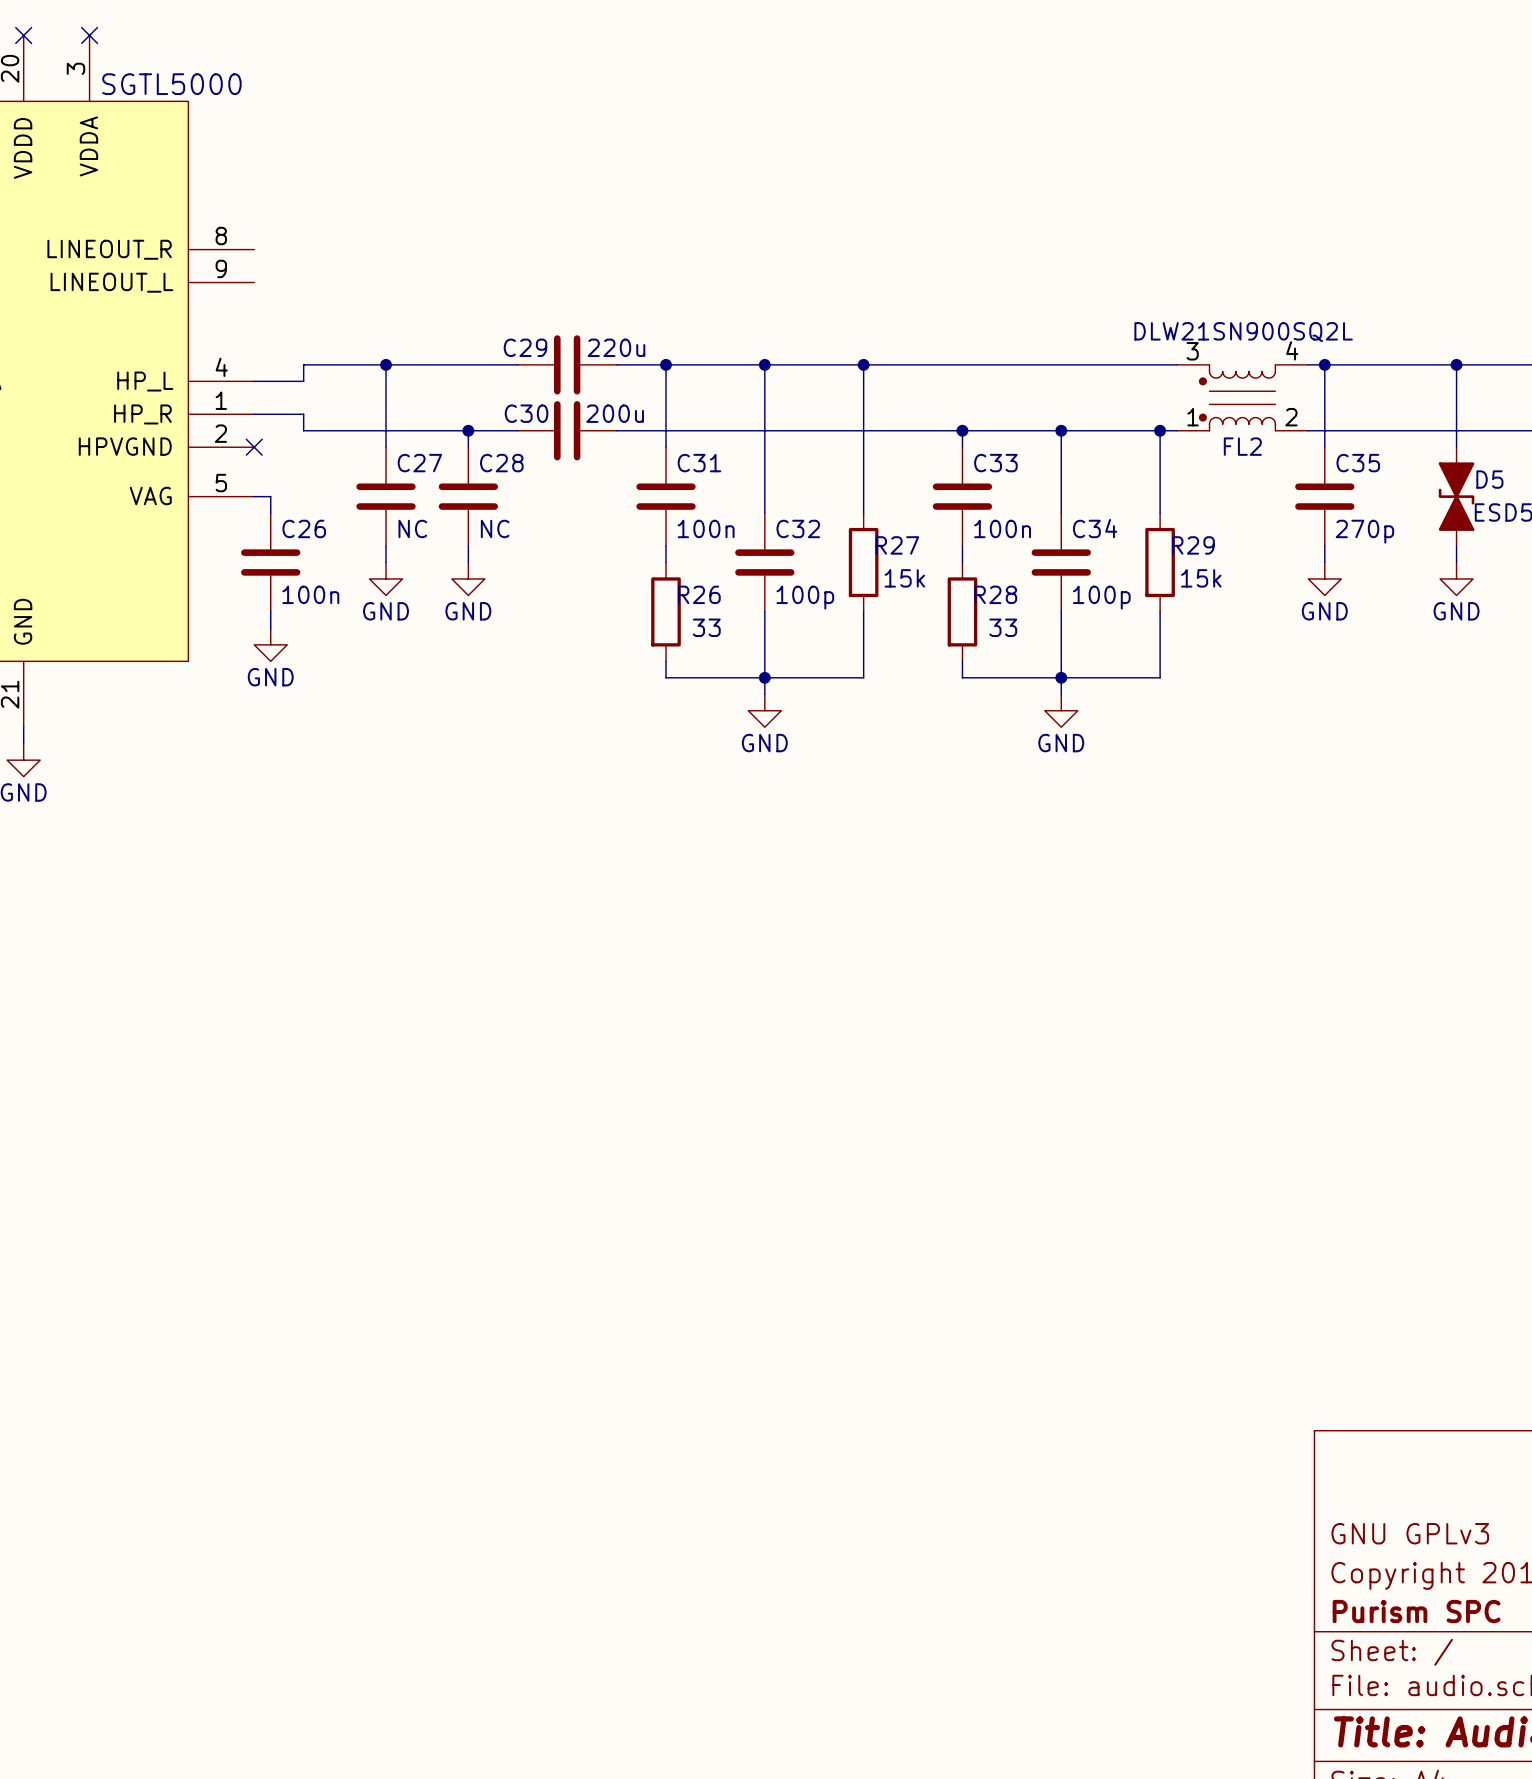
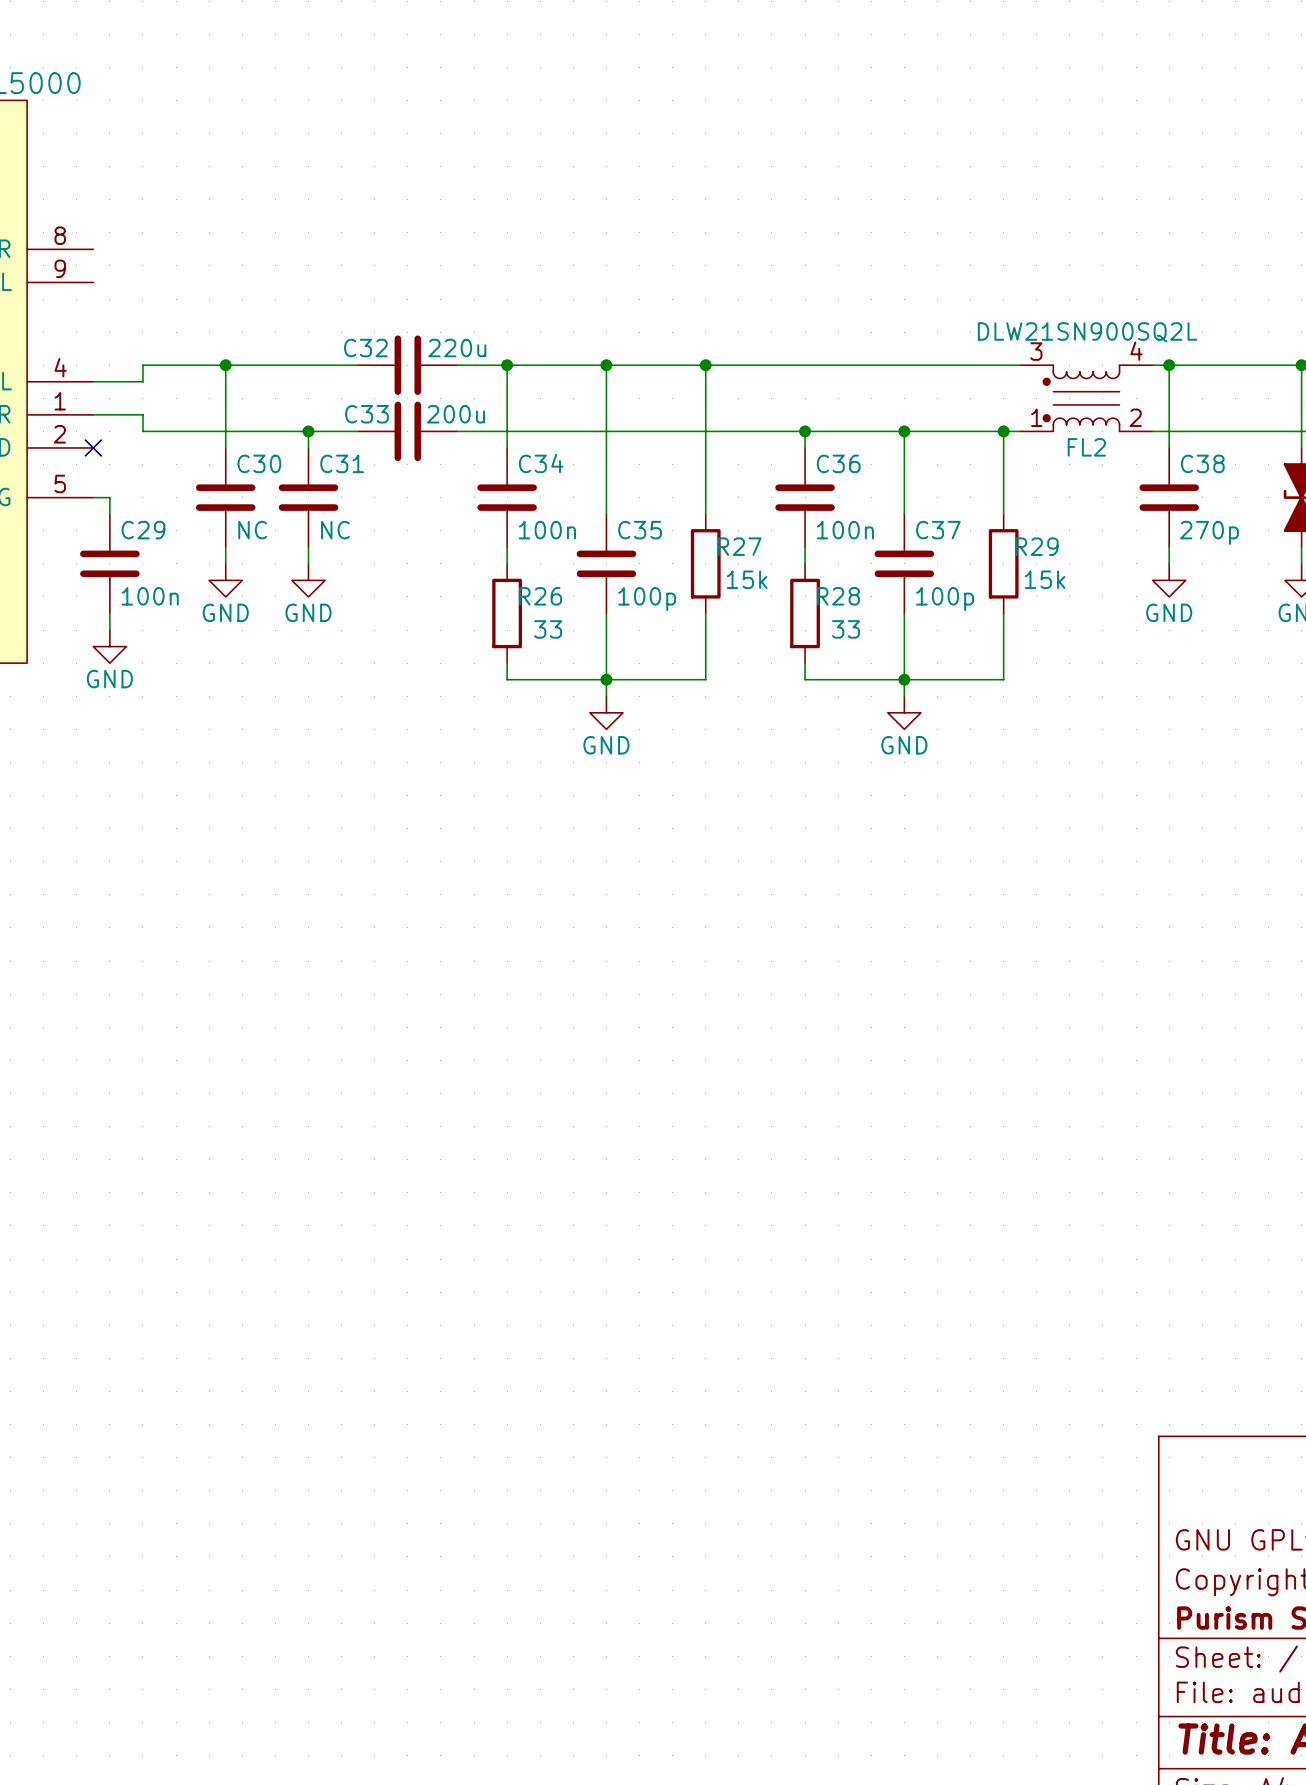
C29 name: C29 (525, 347) -> C32 (365, 348)
C30 name: C30 (526, 413) -> C33 (366, 414)
C27 name: C27 (419, 463) -> C30 (259, 463)
C28 name: C28 (501, 463) -> C31 (342, 463)
C31 name: C31 (699, 463) -> C34 (541, 463)
C33 name: C33 (995, 463) -> C36 (838, 463)
C35 name: C35 (1358, 463) -> C38 (1202, 463)
C26 name: C26 (304, 528) -> C29 (143, 530)
C32 name: C32 (798, 528) -> C35 (640, 530)
C34 name: C34 (1095, 528) -> C37 (938, 530)

